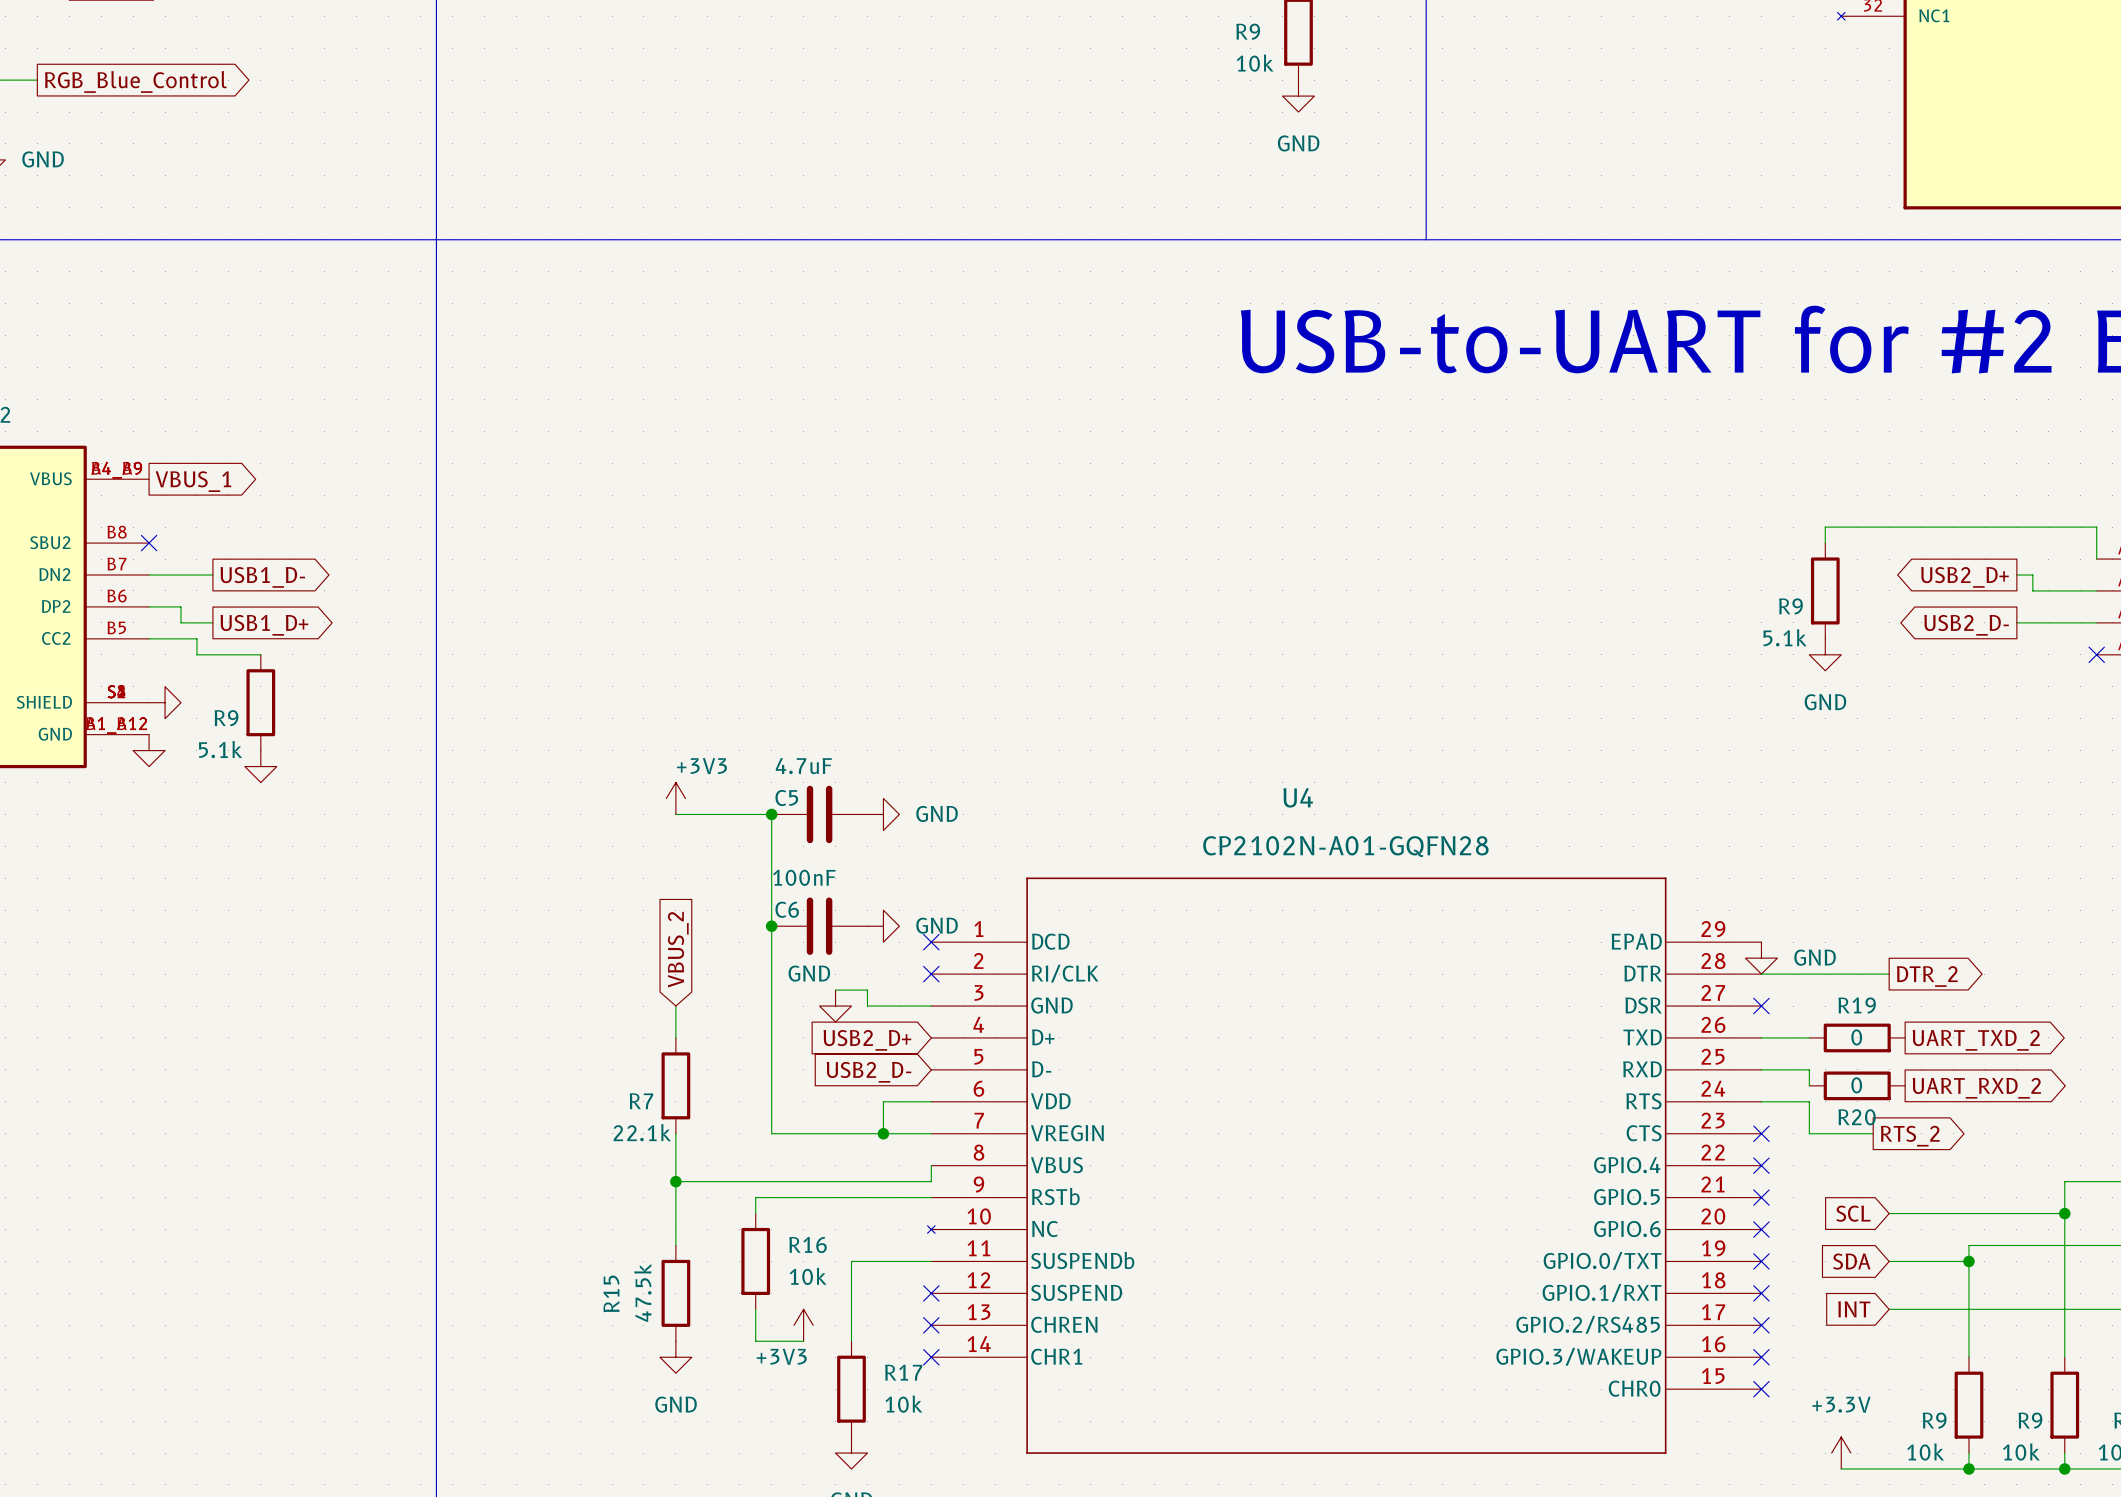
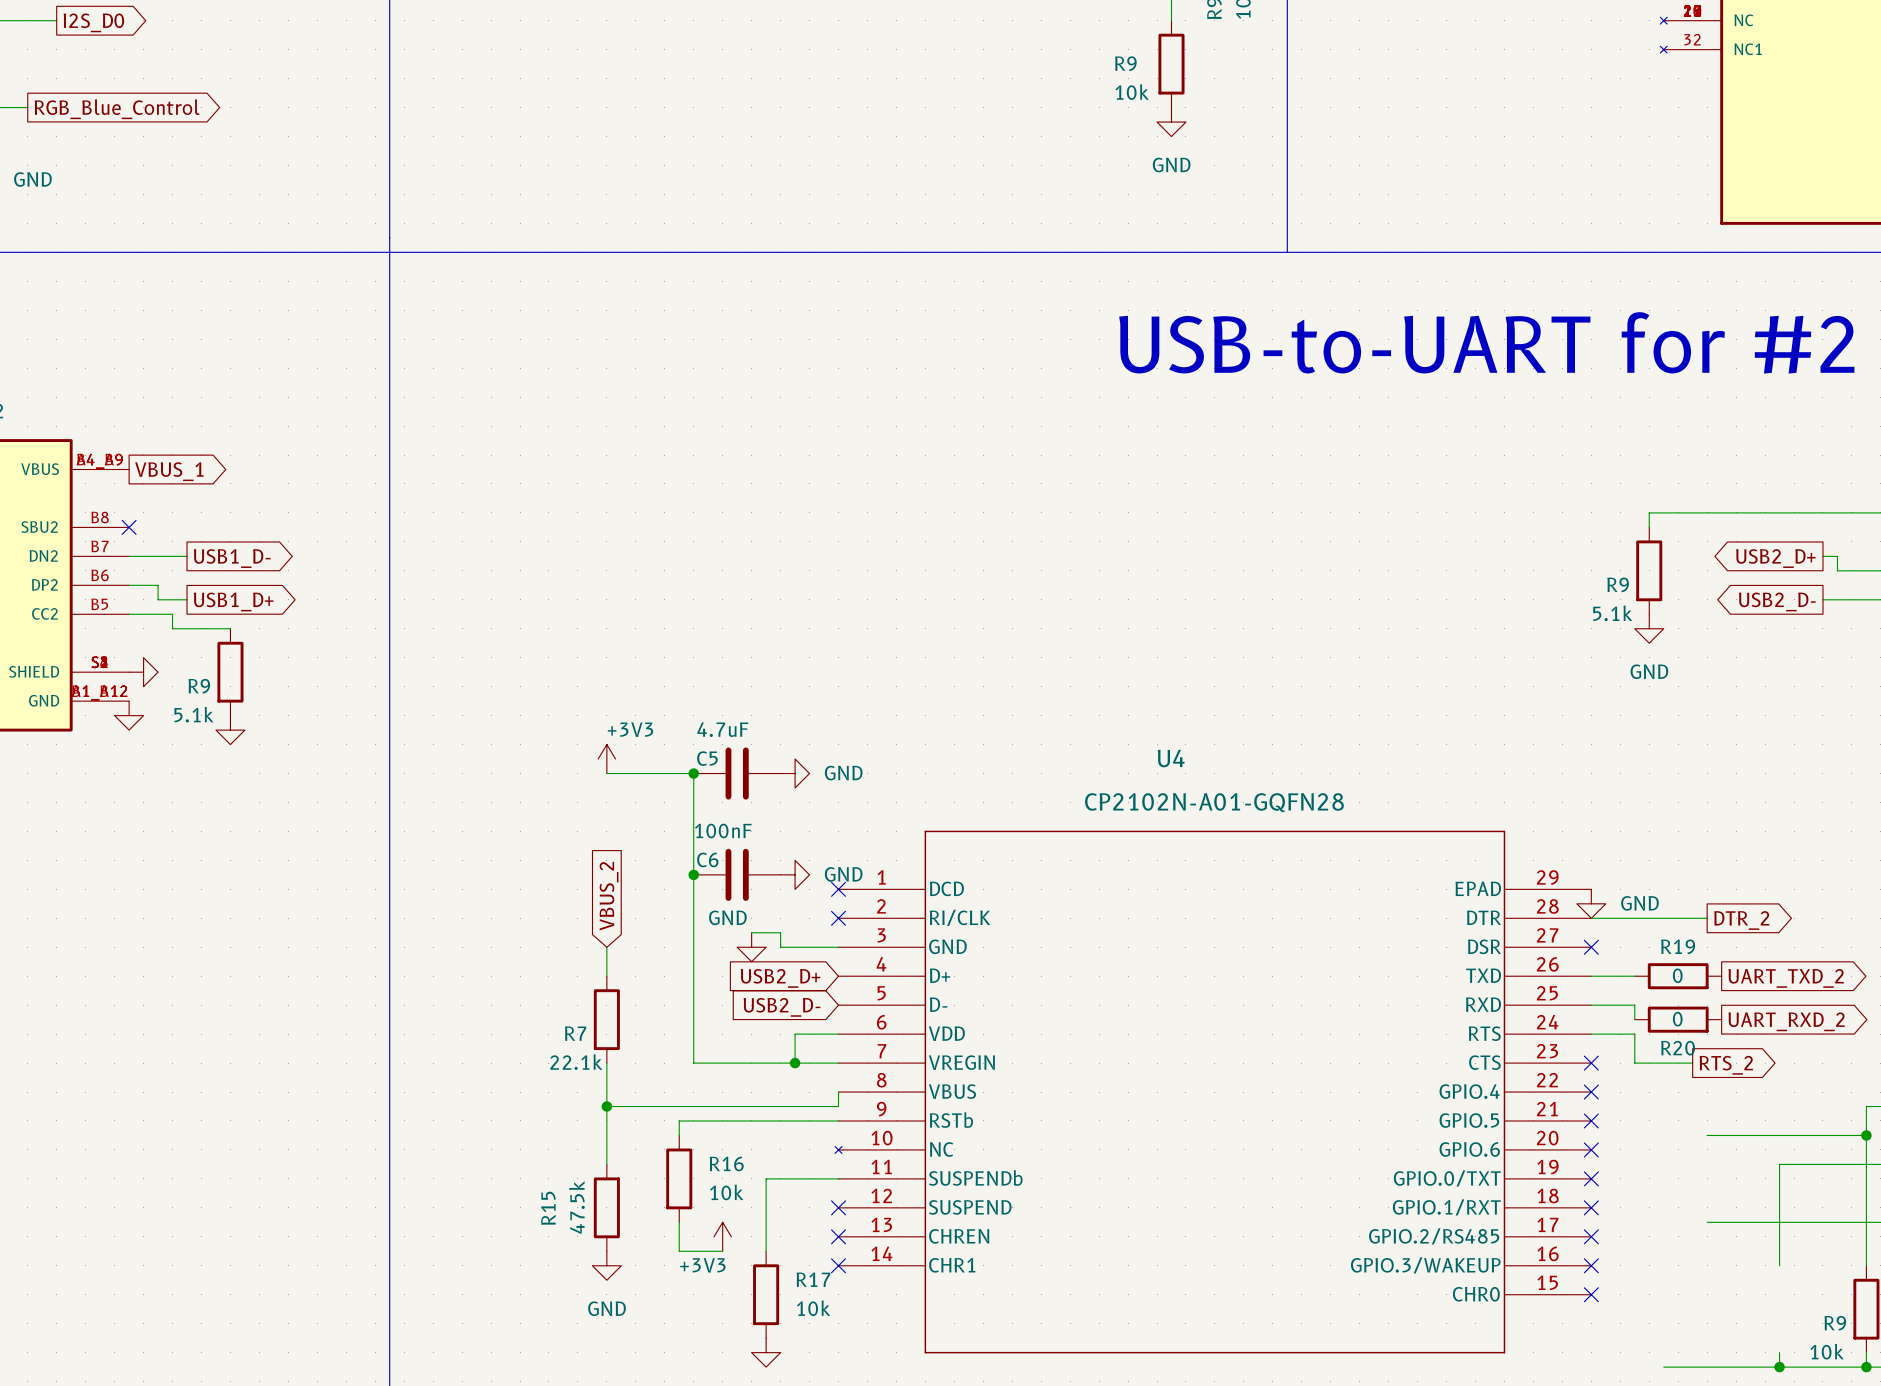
global label: SCL (1853, 1213) -> none
global label: SDA (1851, 1261) -> none
wire: (1889, 1261) (1968, 1261) -> none
junction: (1968, 1261) -> none
global label: INT (1854, 1309) -> none
R9: 10k (1968, 1405) -> none
power symbol: +3.3V (1841, 1453) -> none

